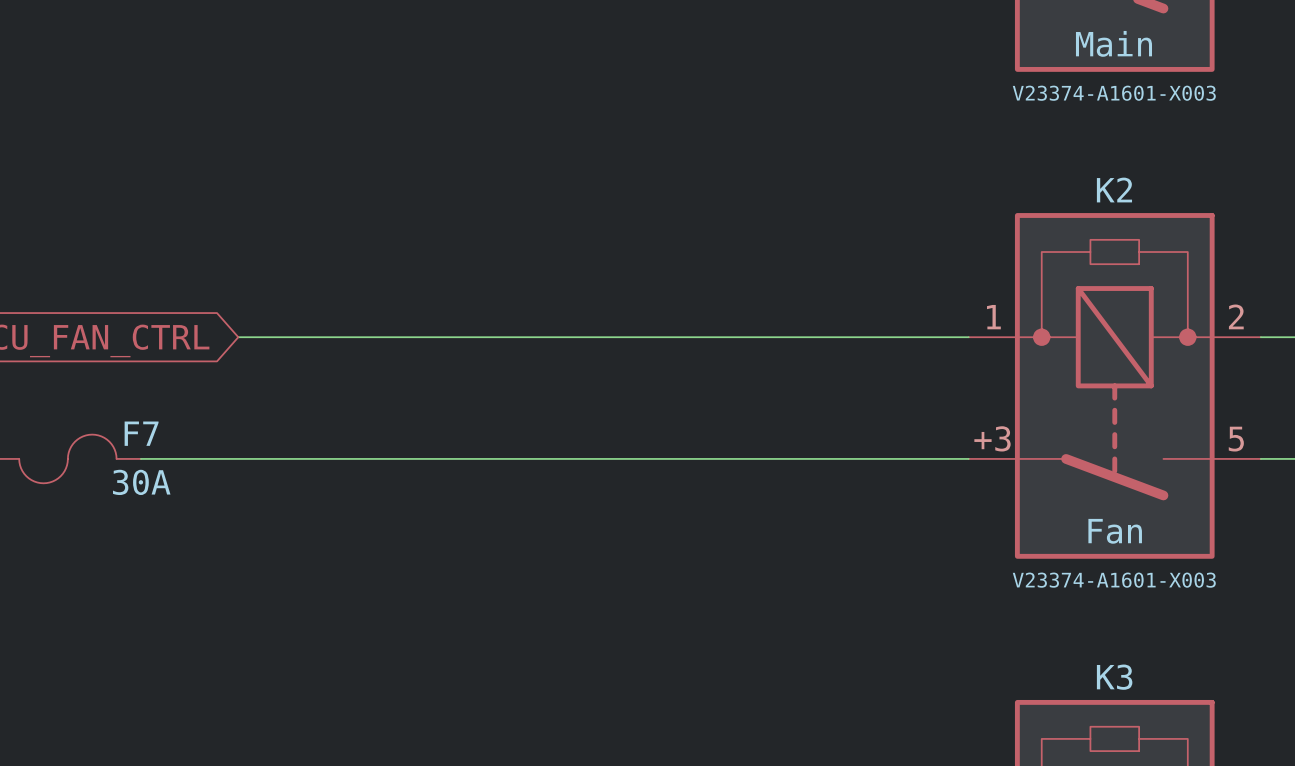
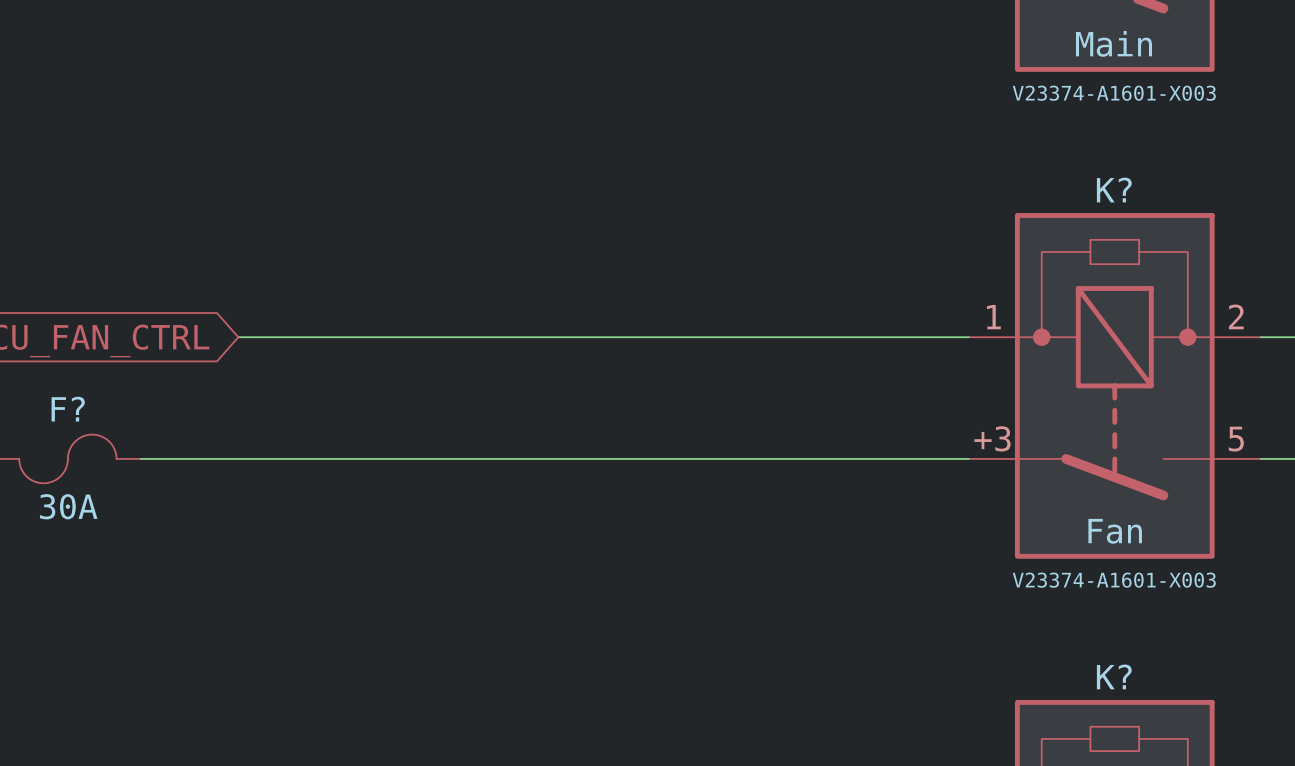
K2 name: K2 (1114, 190) -> K? (1114, 190)
F7 name: F7 (141, 433) -> F? (68, 409)
F7 value position: 30A (141, 482) -> 30A (68, 506)
K3 name: K3 (1114, 677) -> K? (1114, 676)

